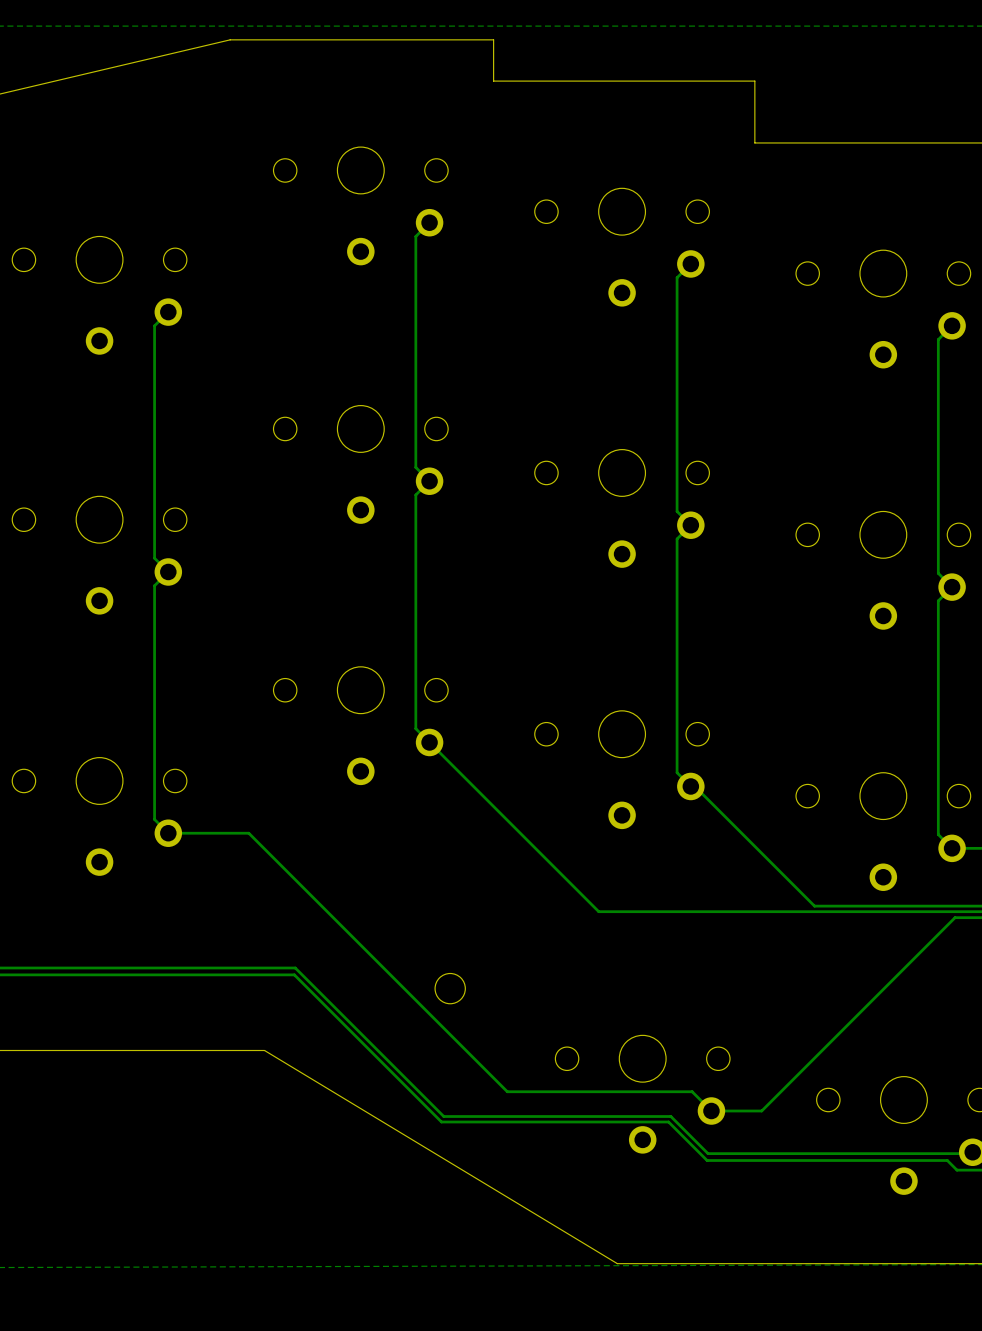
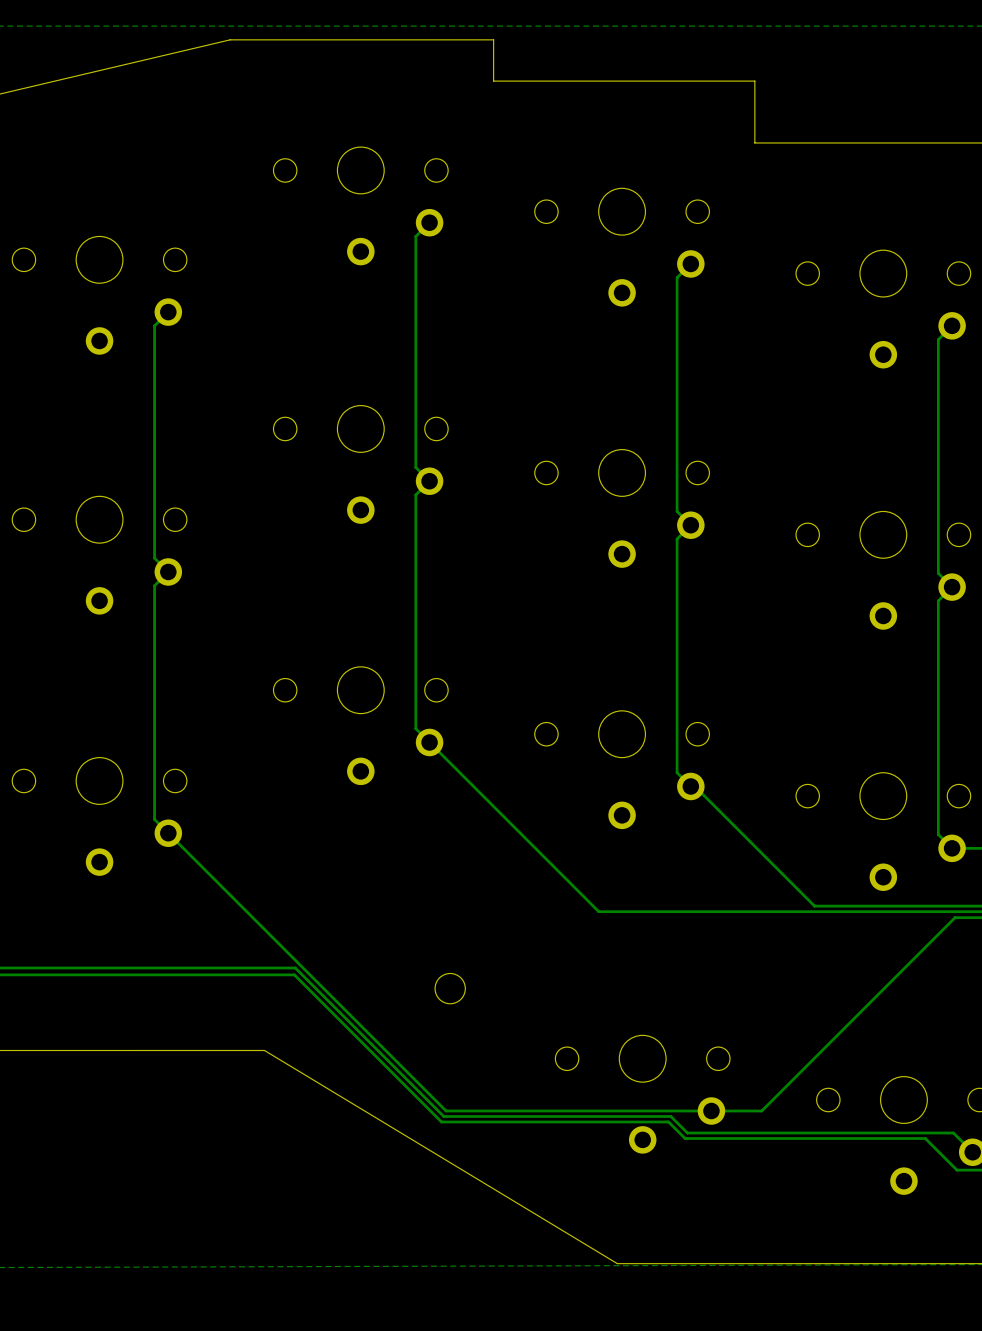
track: (168, 833) (248, 833) (507, 1091) (692, 1091) (711, 1111) -> (168, 833) (446, 1111) (711, 1111)
track: (687, 1133) (708, 1153) (972, 1152) -> (687, 1133) (953, 1133) (972, 1152)
track: (685, 1138) (707, 1160) (947, 1160) -> (685, 1138) (925, 1138) (947, 1160)

